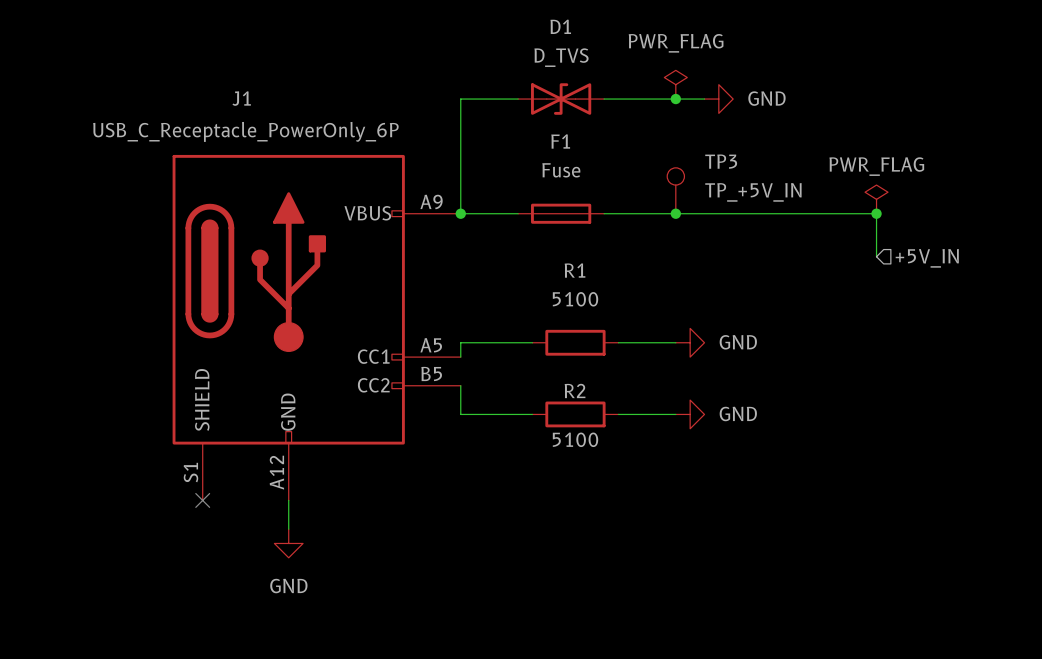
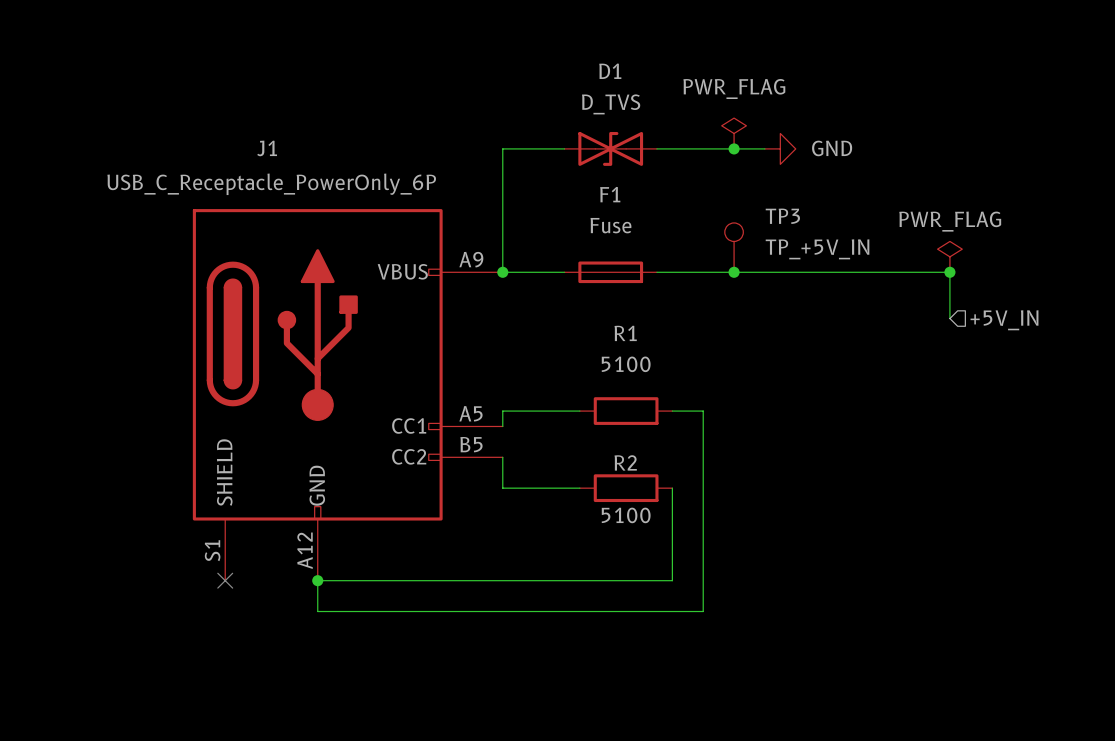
wire: (647, 342) (675, 342) -> (703, 411) (703, 611) (317, 611)
power symbol: GND (690, 342) -> none
wire: (618, 414) (675, 414) -> (672, 488) (672, 580) (317, 580)
power symbol: GND (690, 414) -> none
junction: none -> (317, 580)
power symbol: GND (288, 543) -> none

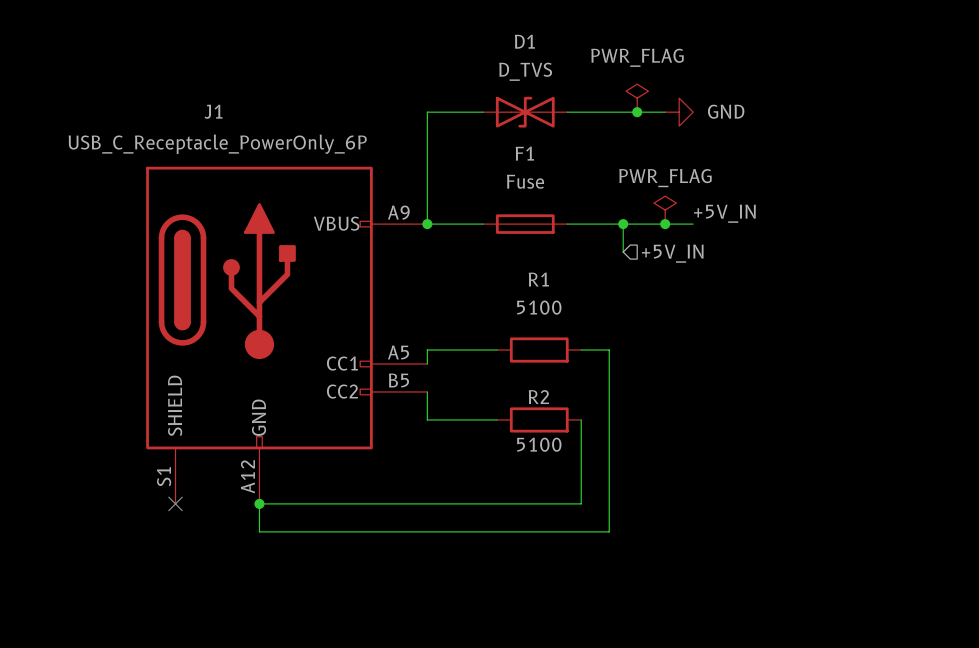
TP3: TP_+5V_IN (734, 247) -> none
power symbol position: PWR_FLAG (949, 256) -> PWR_FLAG (665, 210)
label: none -> +5V_IN (724, 213)
wire: none -> (623, 224) (623, 252)
junction: none -> (623, 224)
junction: (734, 272) -> none
junction: none -> (665, 224)
wire: (795, 272) (949, 272) (949, 318) -> none
junction: (949, 272) -> none
hierarchical label position: +5V_IN (1004, 320) -> +5V_IN (672, 253)

